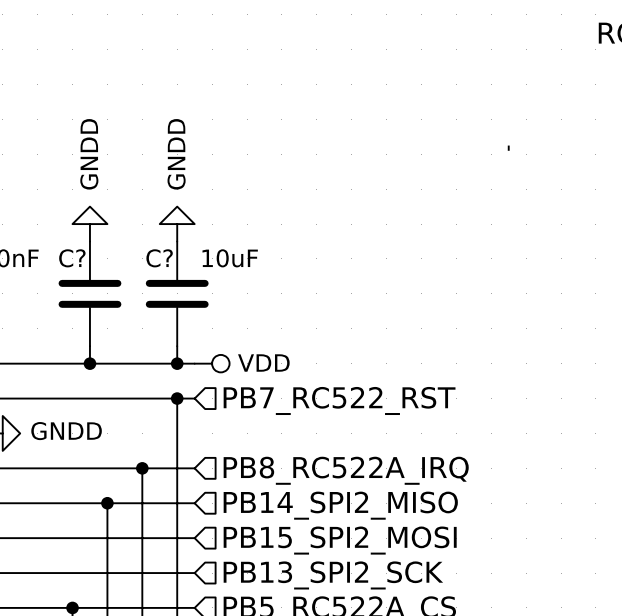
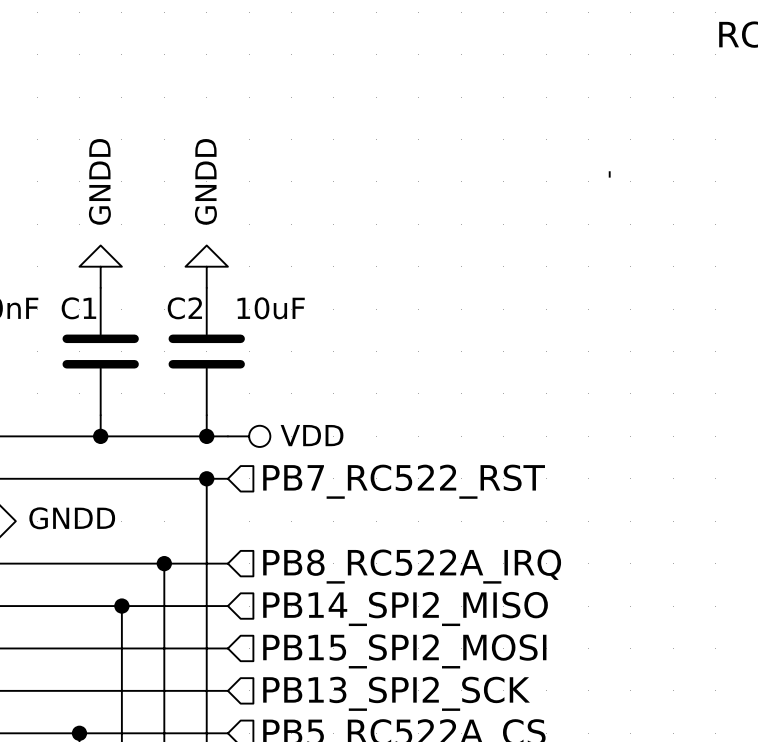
C? name: C? (72, 258) -> C1 (78, 308)
C? name: C? (159, 258) -> C2 (184, 308)

